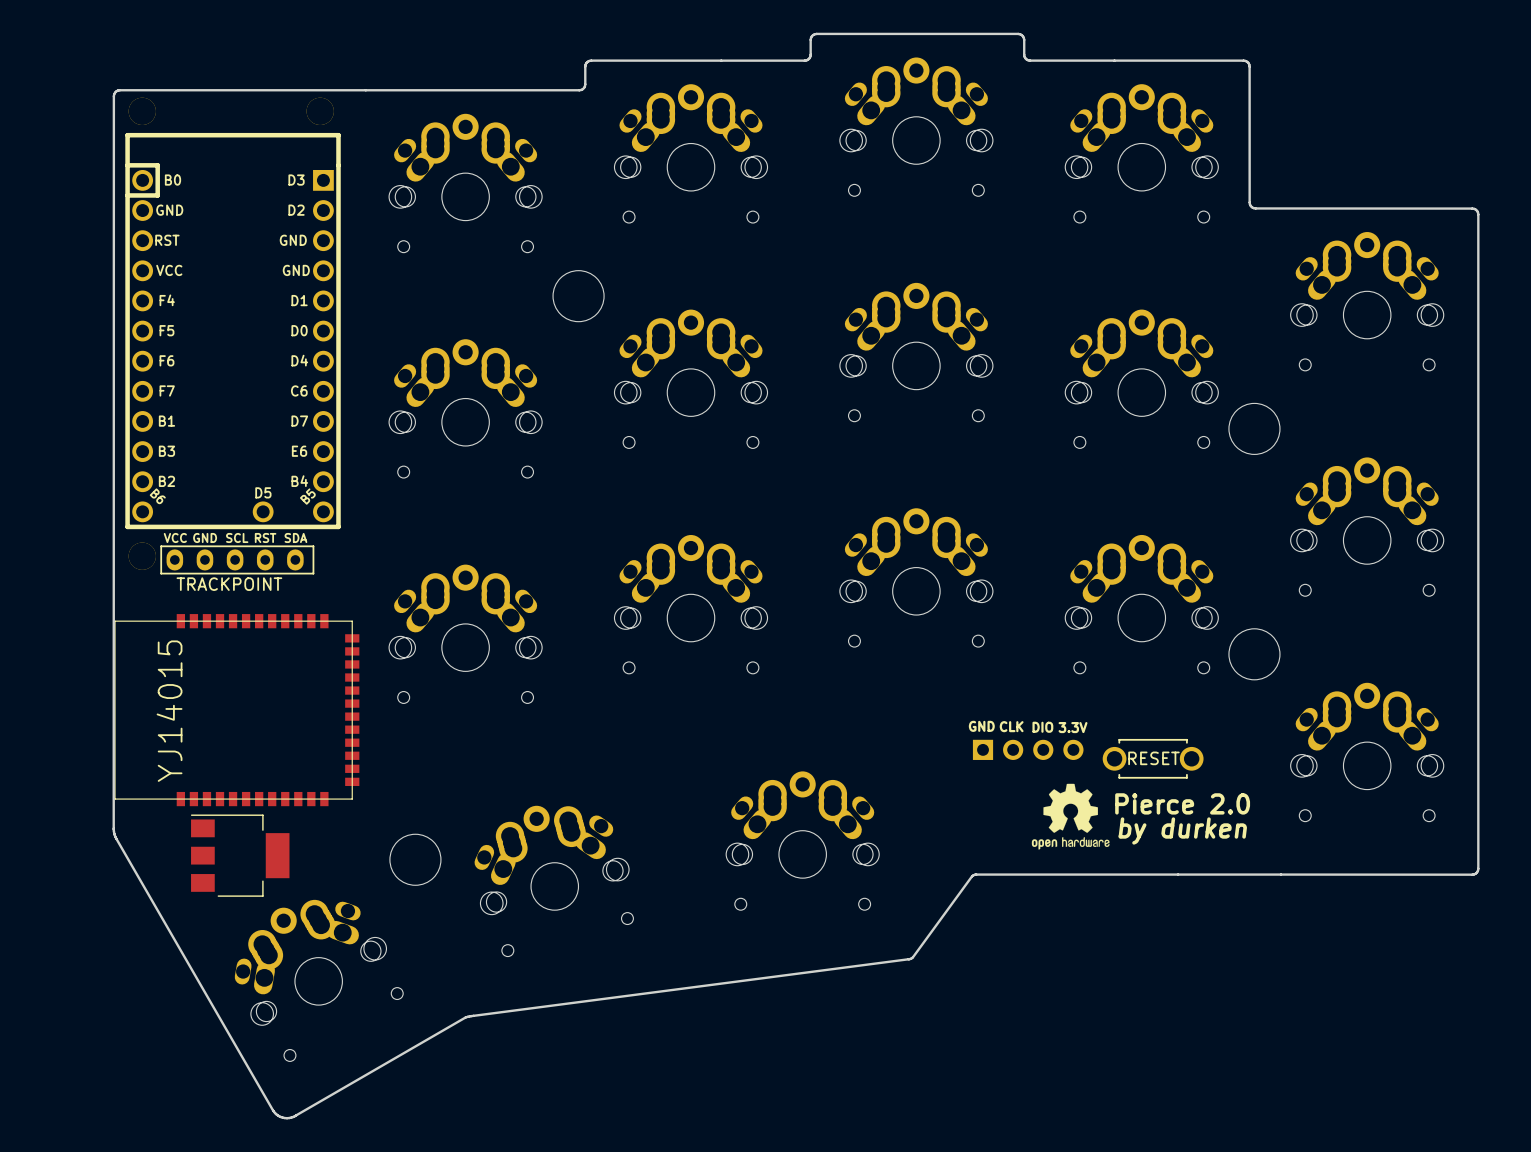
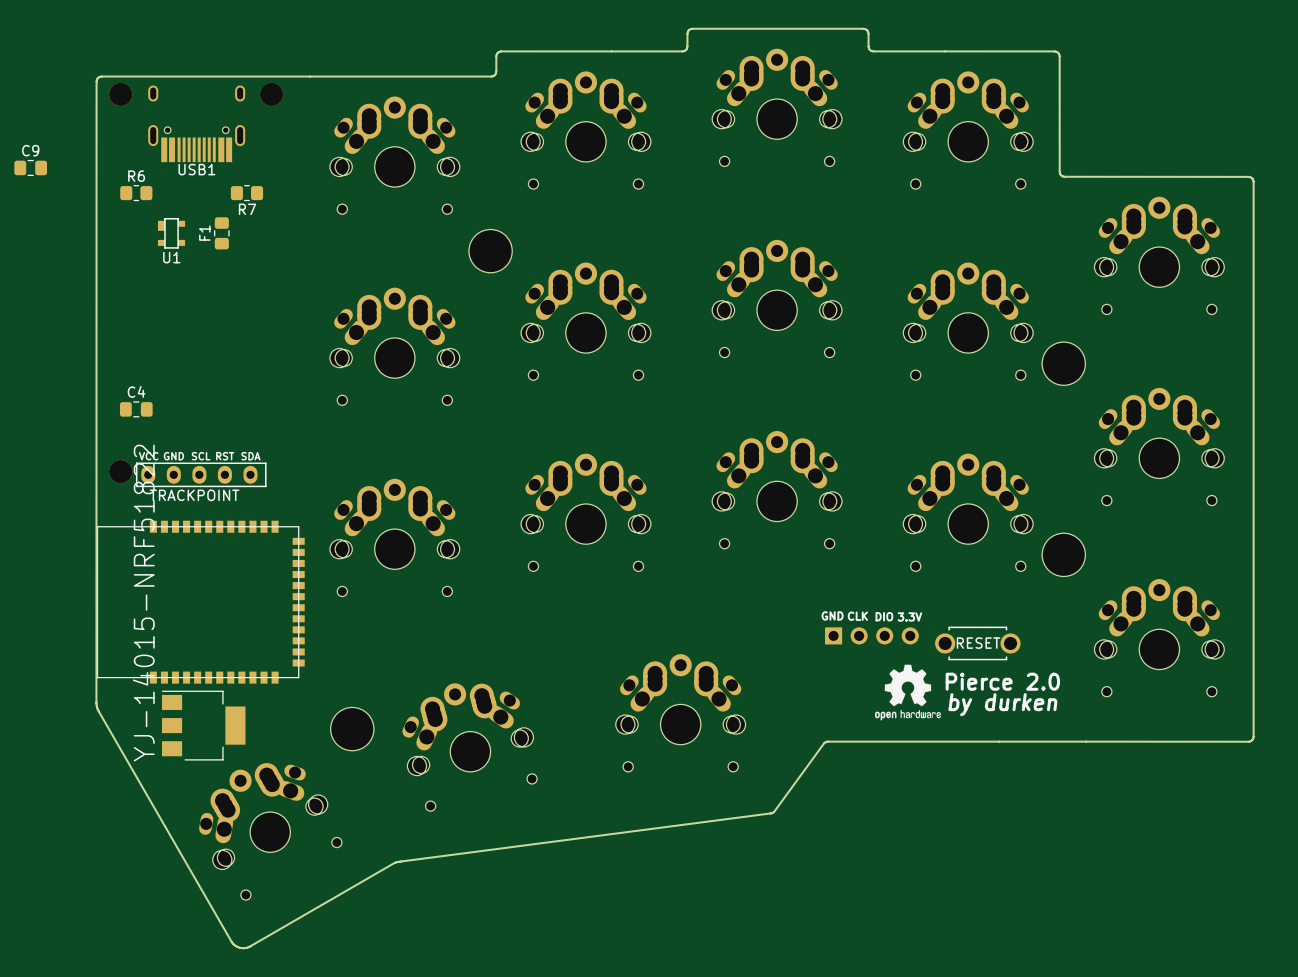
USB1: none -> (196, 123)
C9: none -> (30, 167)
R6: none -> (136, 193)
R7: none -> (246, 193)
U1: none -> (171, 233)
F1: none -> (221, 233)
part: (233, 331) -> none
C4: none -> (136, 409)
part value: YJ14015 (169, 711) -> YJ-14015-NRF51822 (143, 603)

